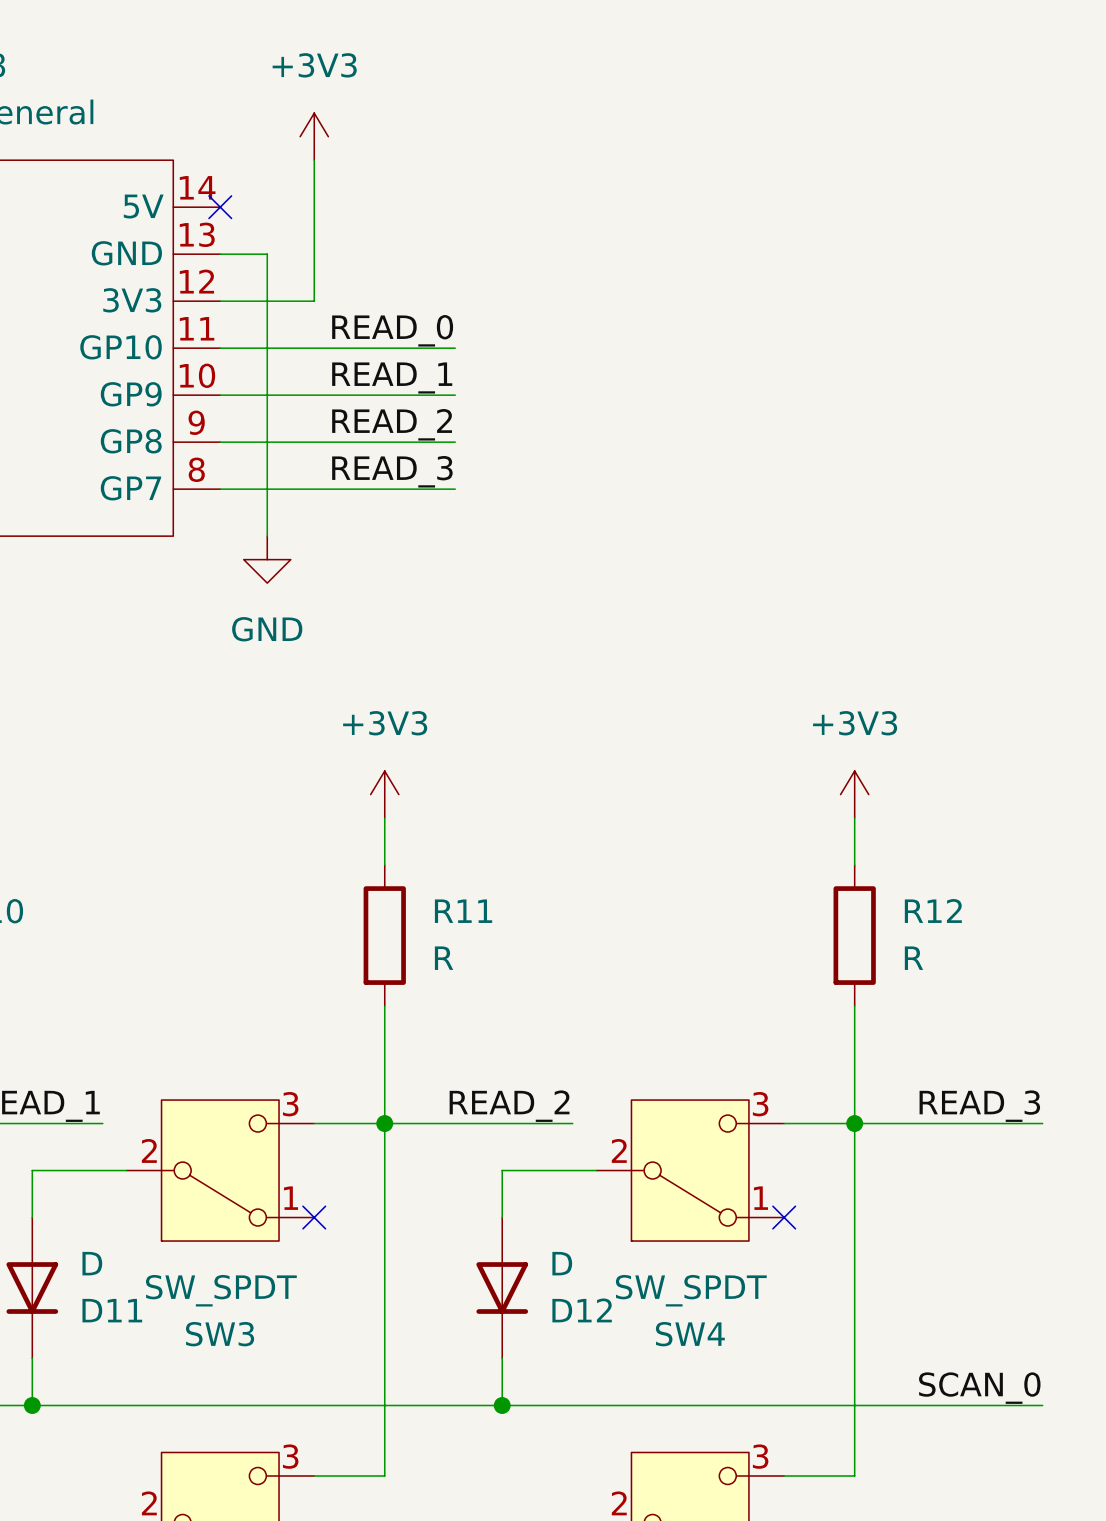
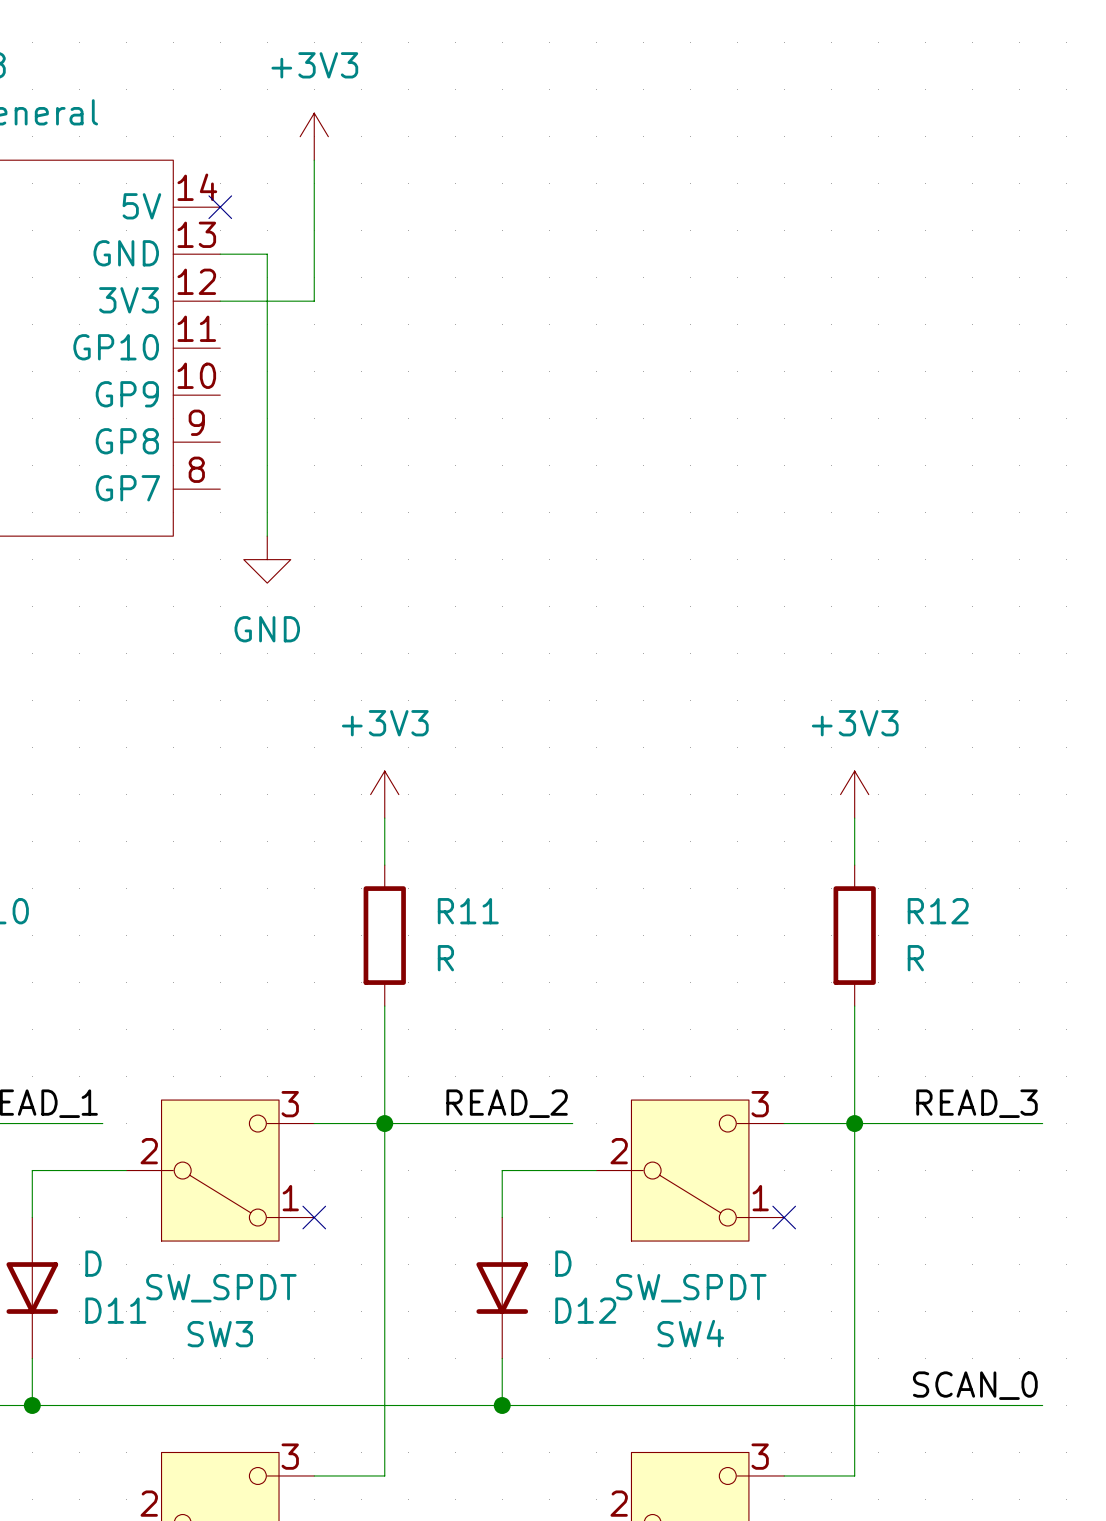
label: READ_0 (392, 330) -> none
wire: (220, 348) (455, 348) -> none
label: READ_1 (392, 377) -> none
wire: (220, 395) (455, 395) -> none
label: READ_2 (392, 424) -> none
wire: (220, 442) (455, 442) -> none
label: READ_3 (392, 471) -> none
wire: (220, 489) (455, 489) -> none

